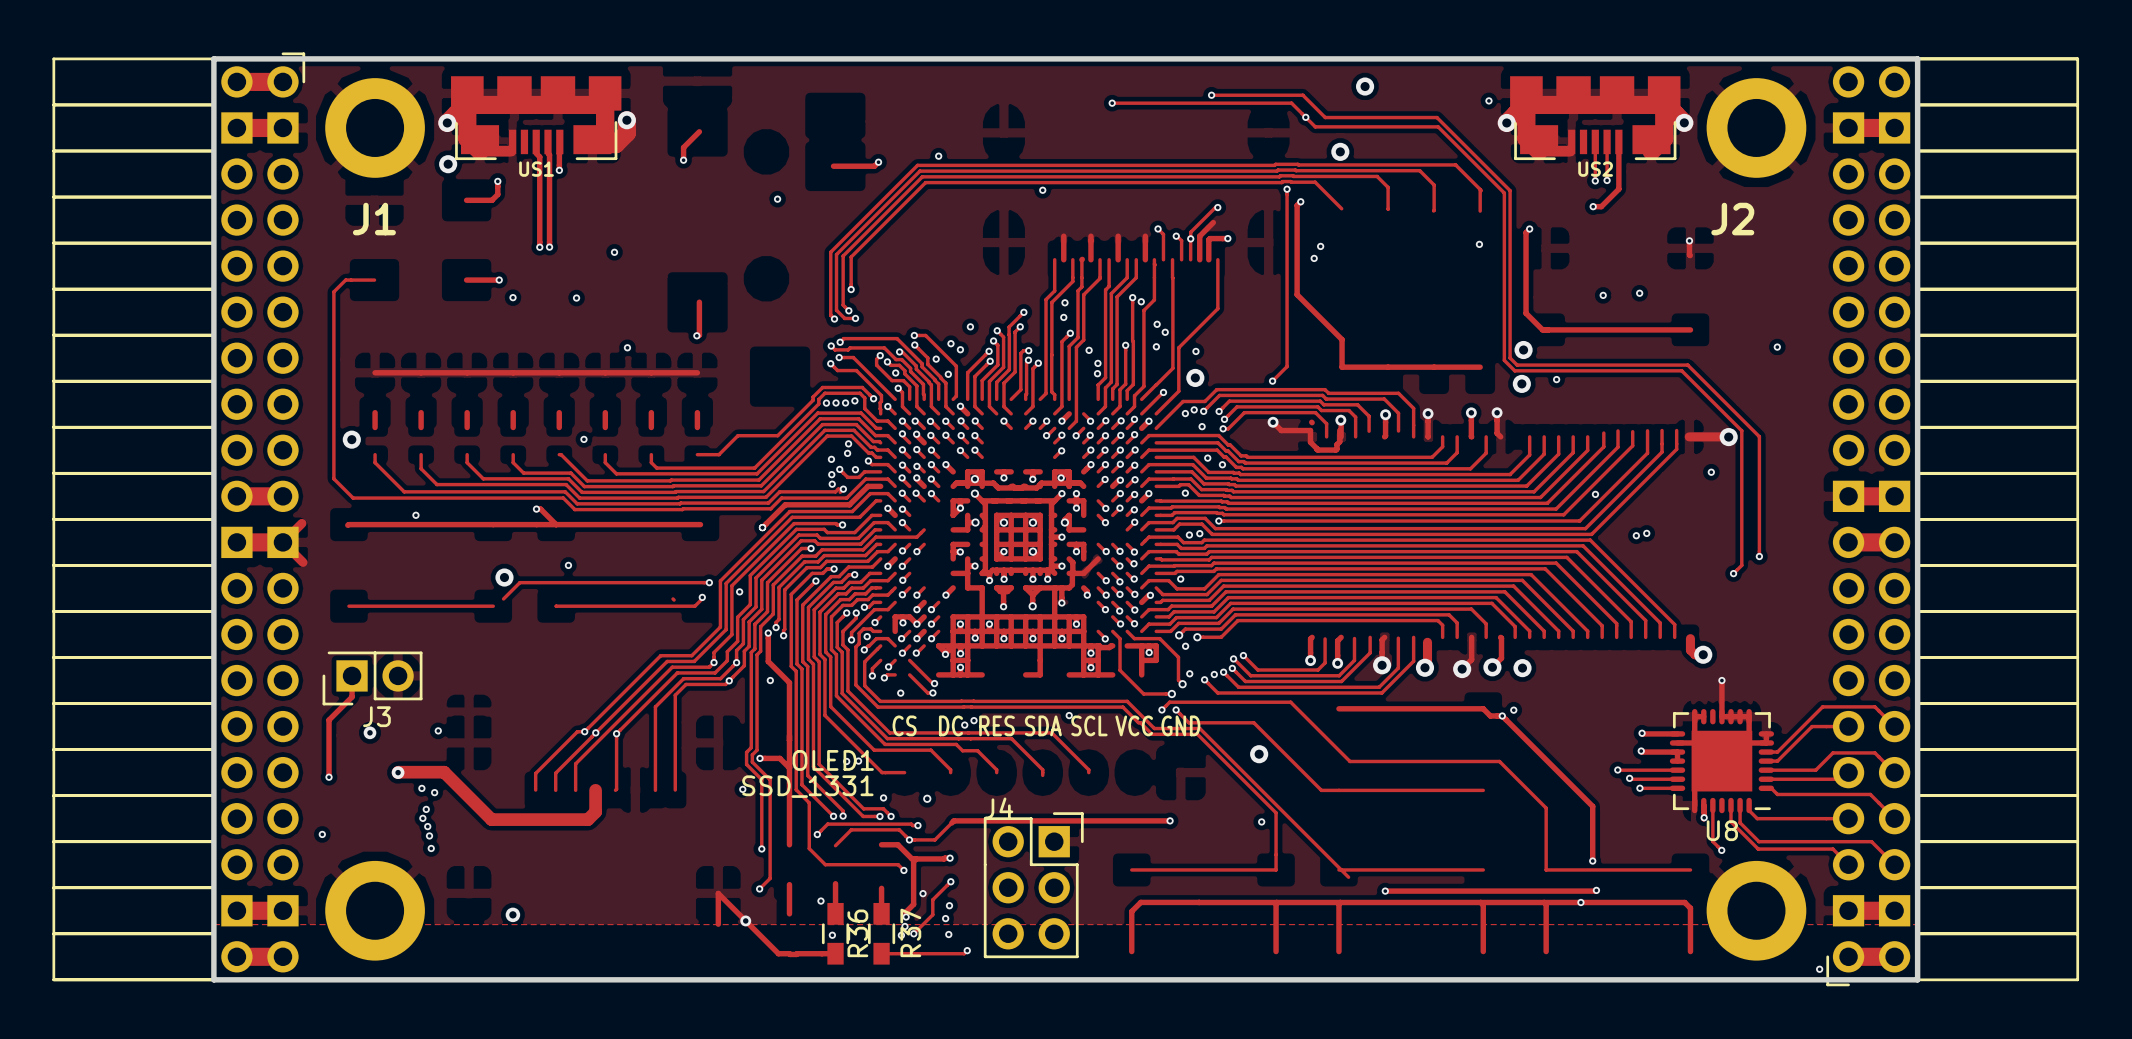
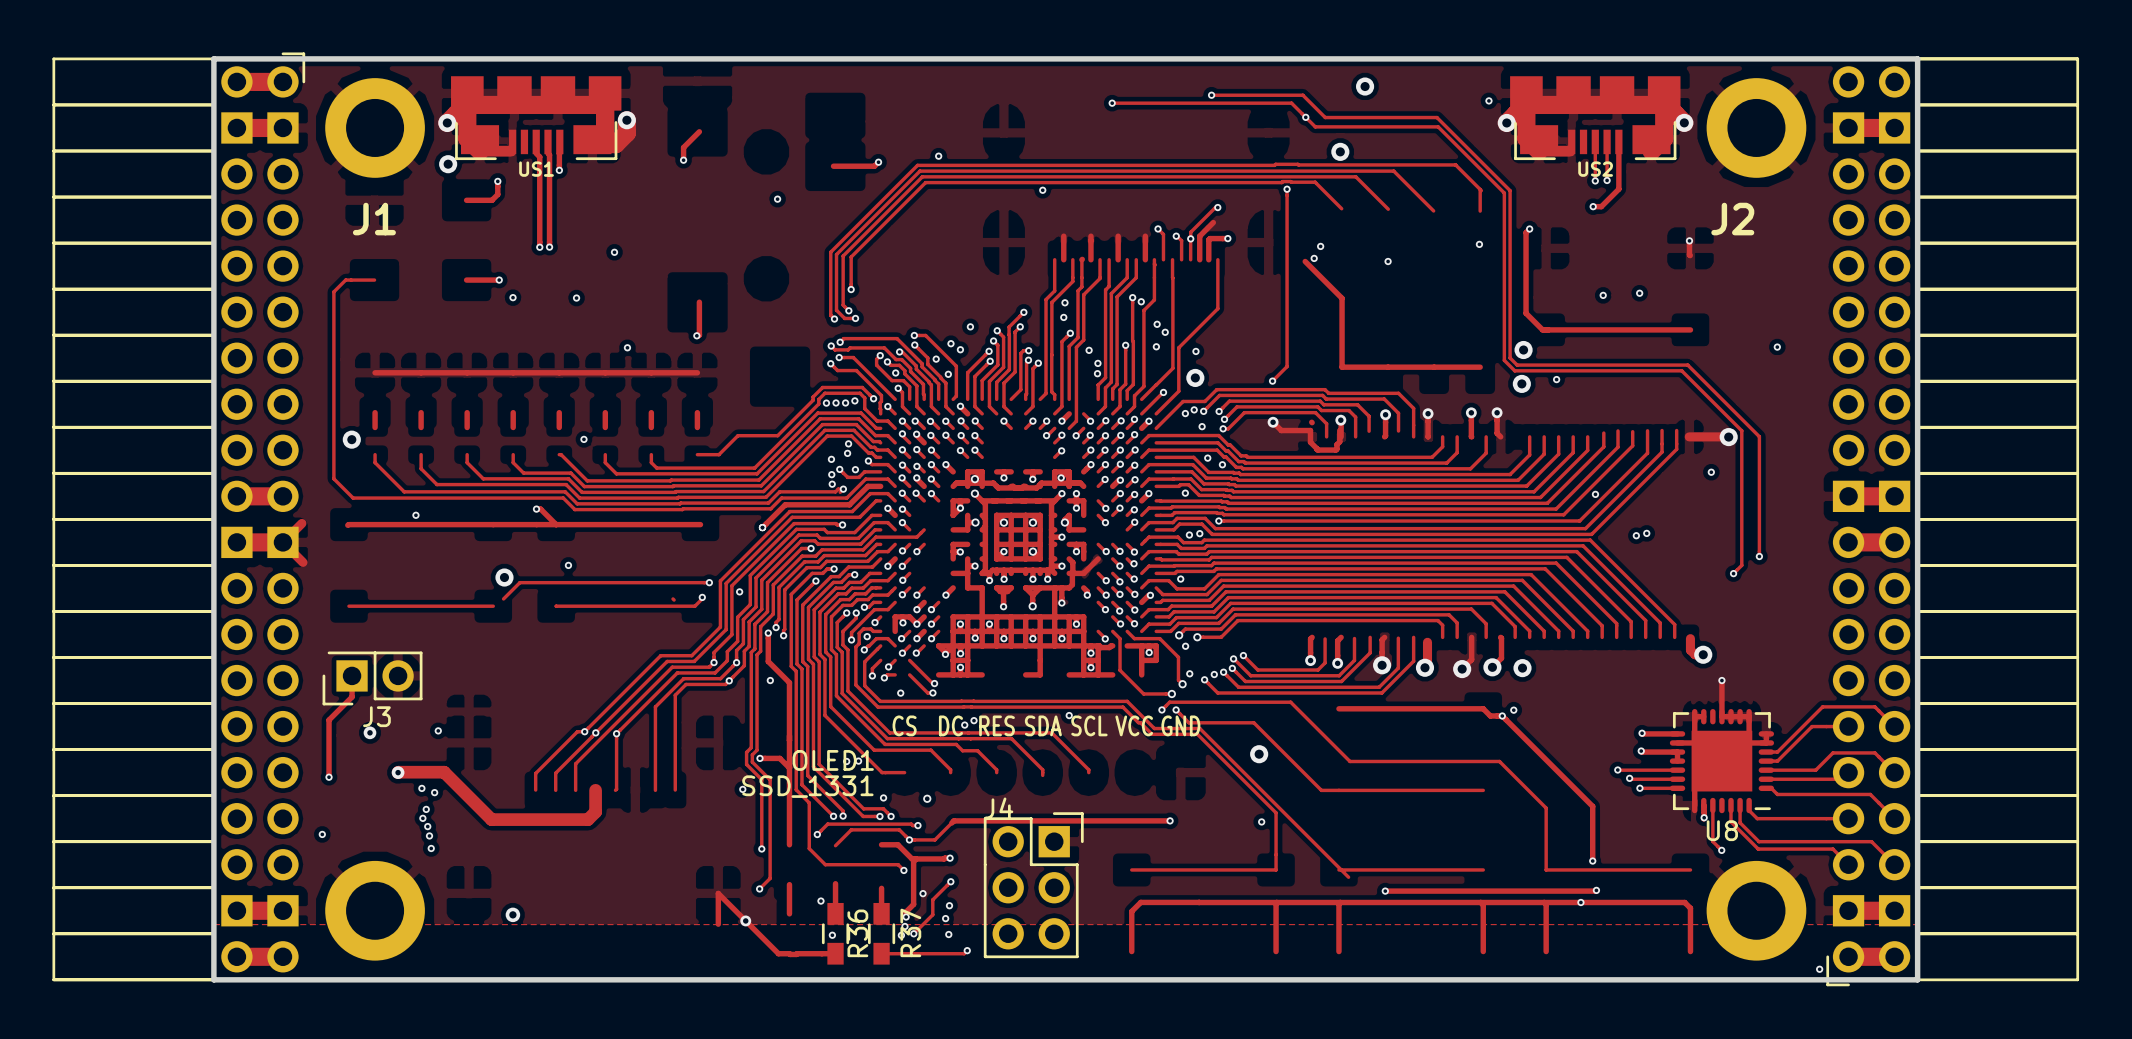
track: (1277, 171) (1419, 170) (1434, 185) (1433, 210) -> (1277, 171) (1393, 171) (1433, 210)
track: (1279, 176) (1377, 176) (1388, 187) (1388, 209) -> (1279, 176) (1355, 176) (1388, 209)
track: (1300, 201) (1297, 205) (1297, 294) (1342, 339) -> (1305, 261) (1342, 298) (1342, 339)
via position: (1300, 201) -> (1388, 261)

